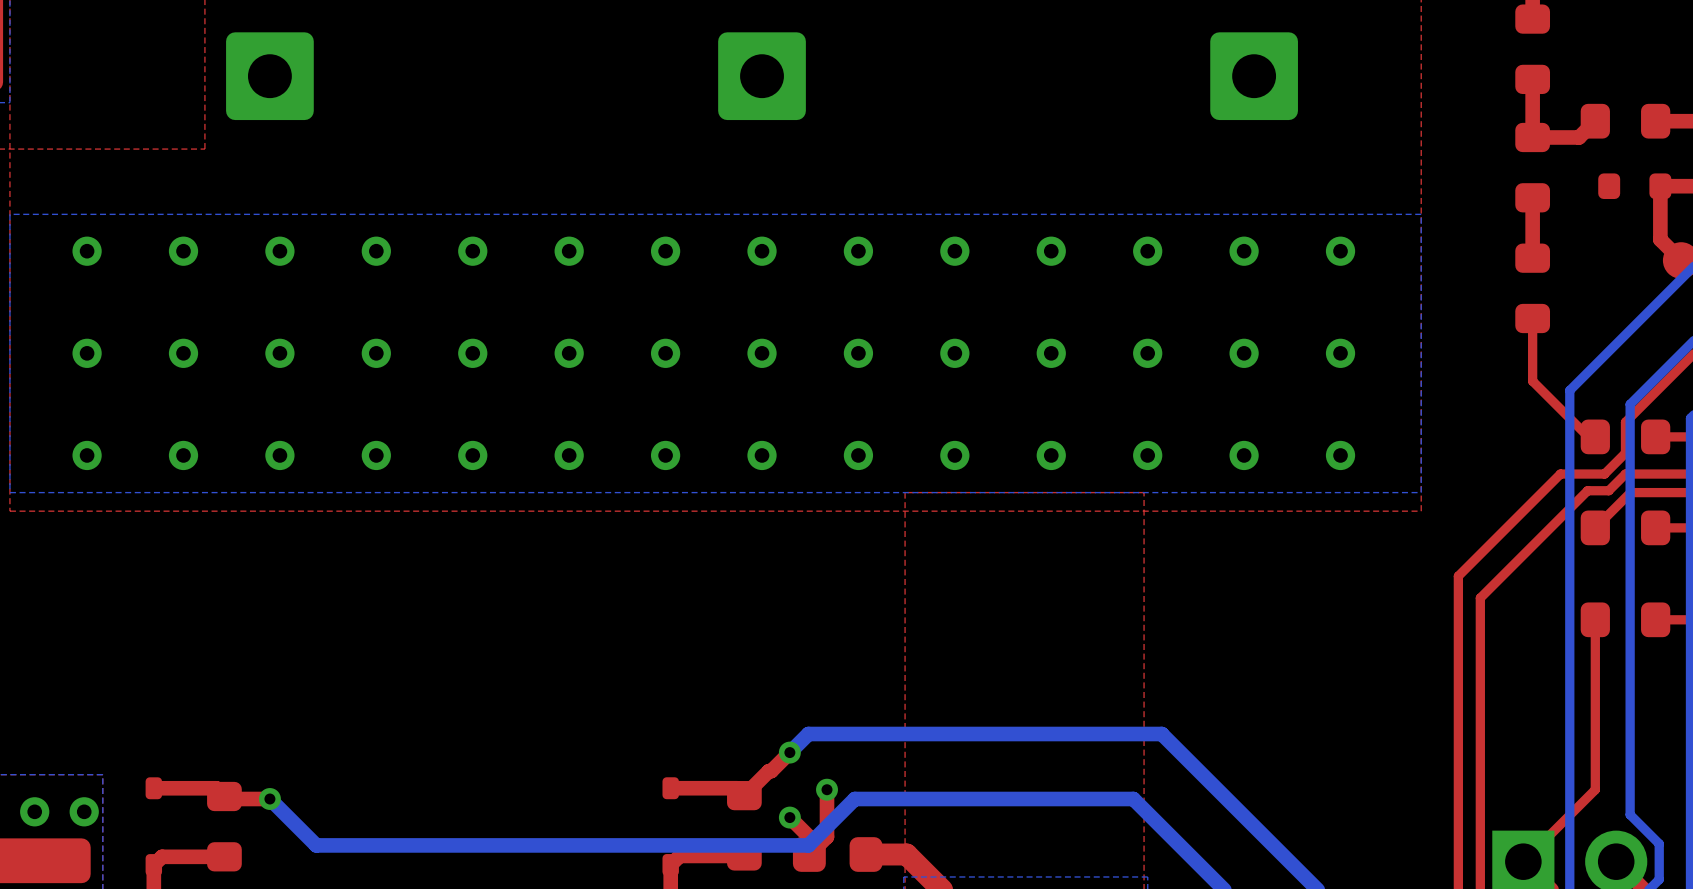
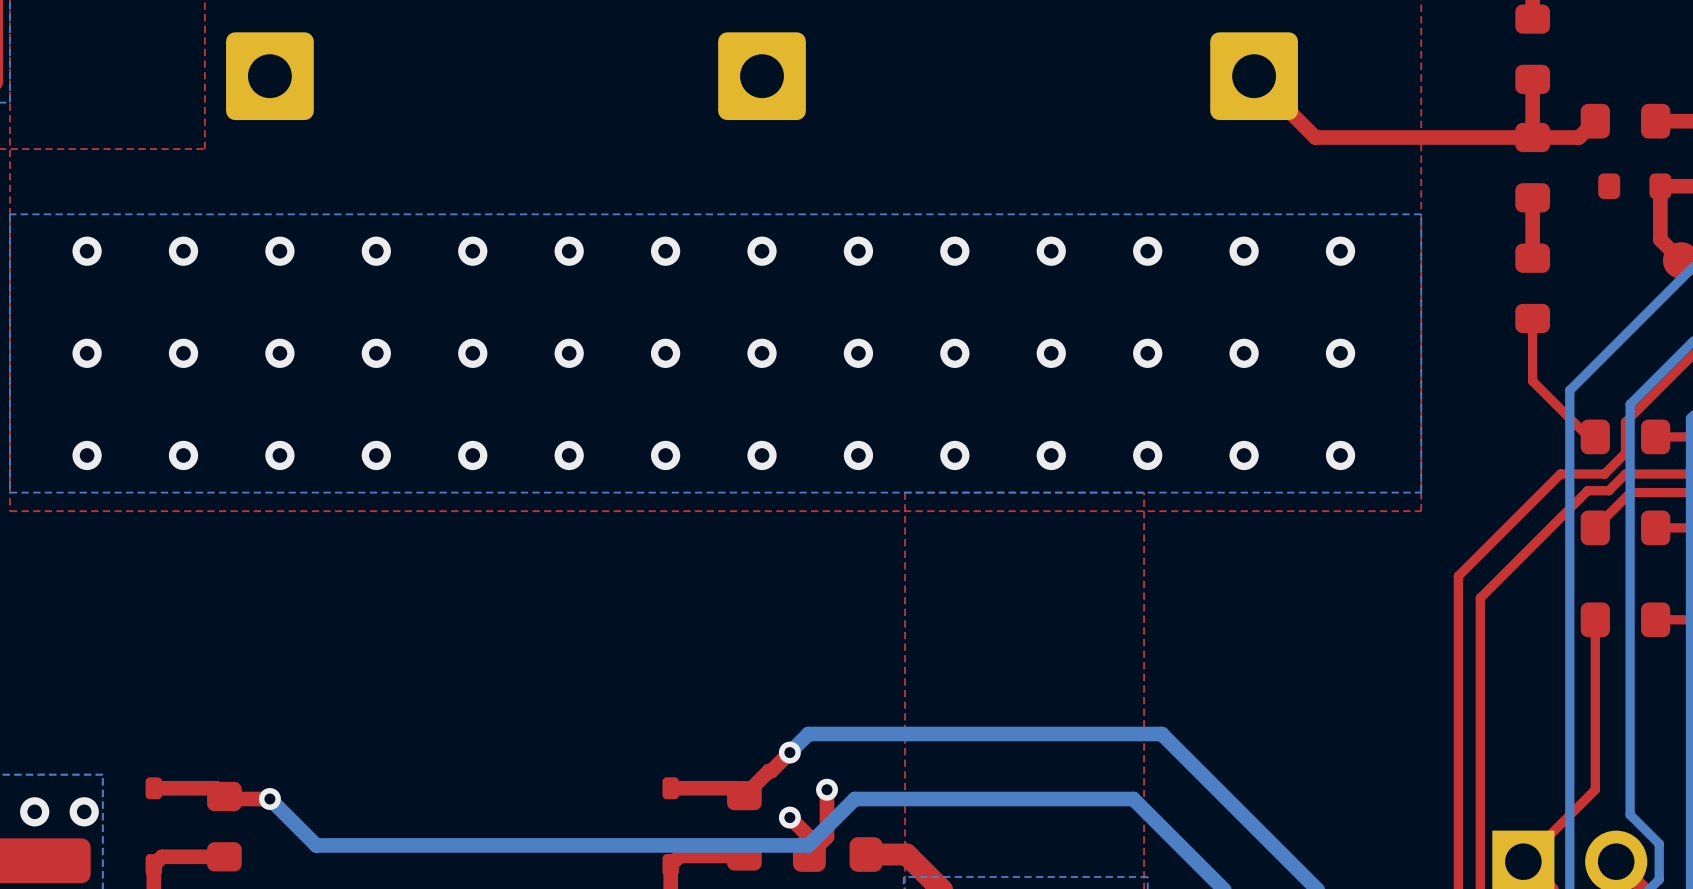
top track: none -> (1254, 76) (1315, 137) (1532, 137)

